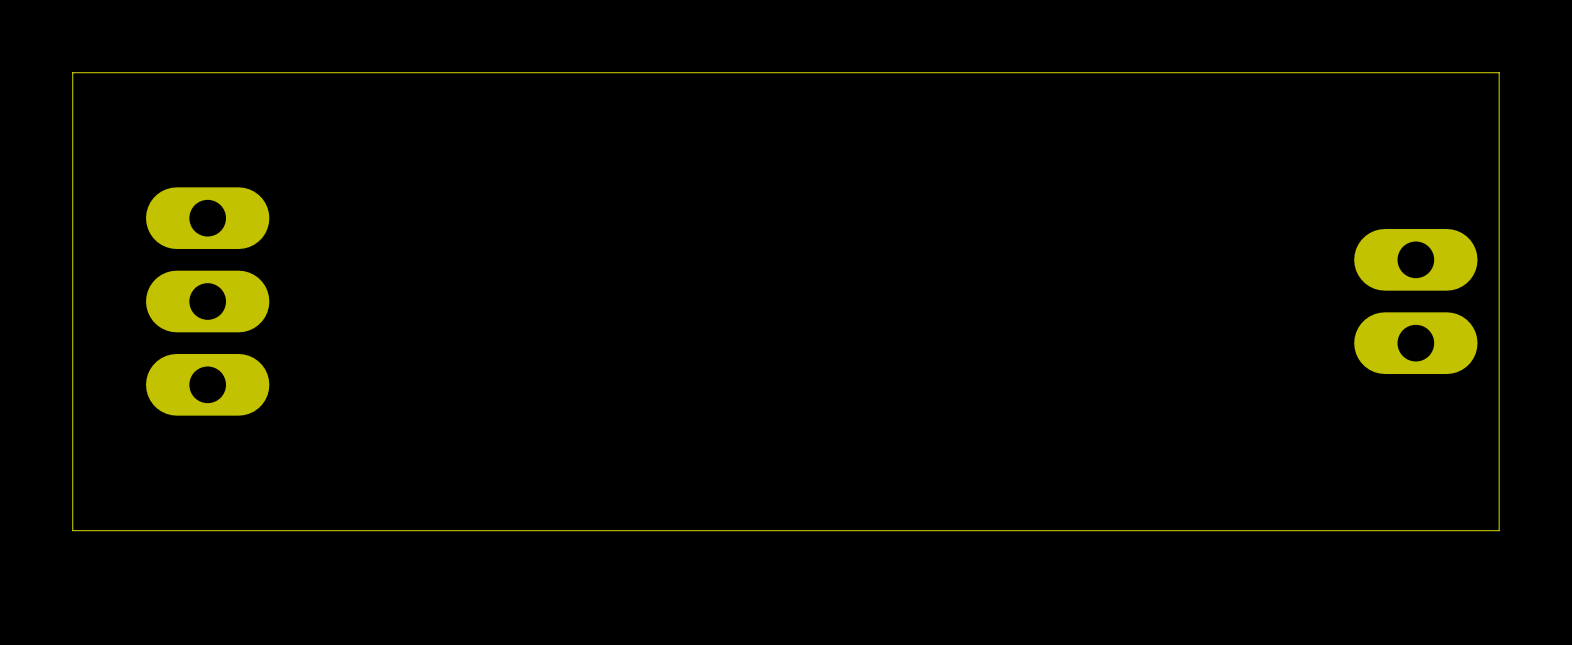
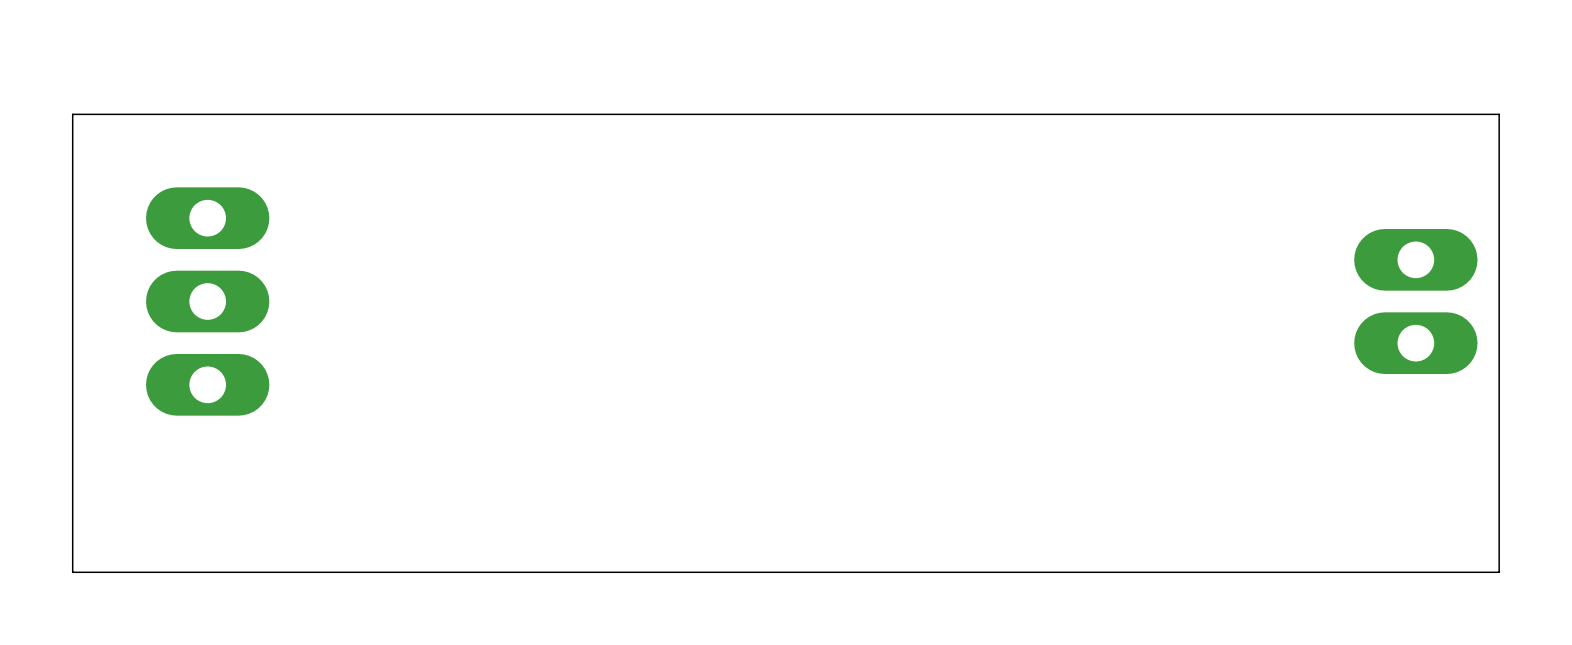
board edge: (1499, 114) (1499, 72) (72, 72) (72, 114) -> (1499, 114) (72, 114)
board edge: (1499, 530) (72, 530) -> (1499, 530) (1499, 572) (72, 572) (72, 530)

